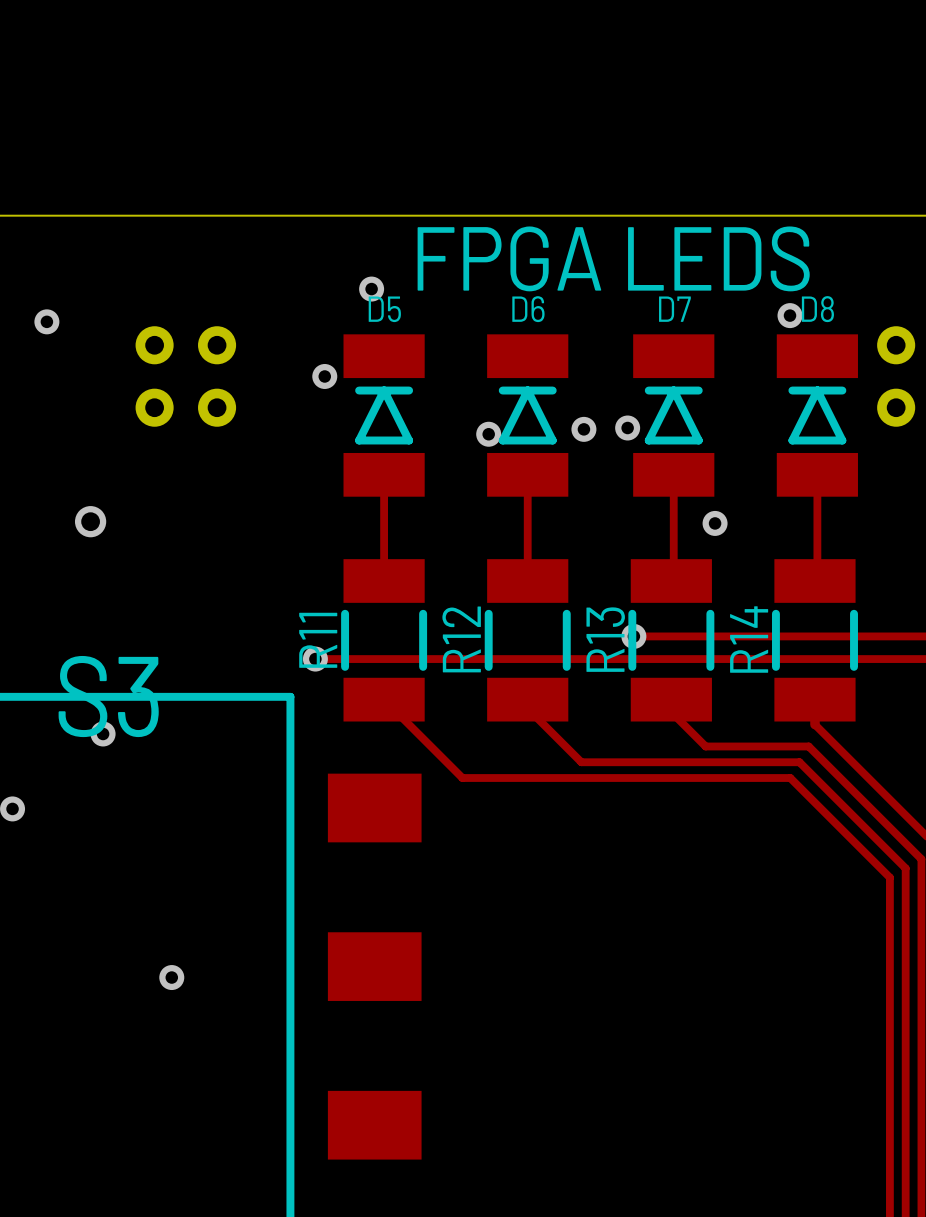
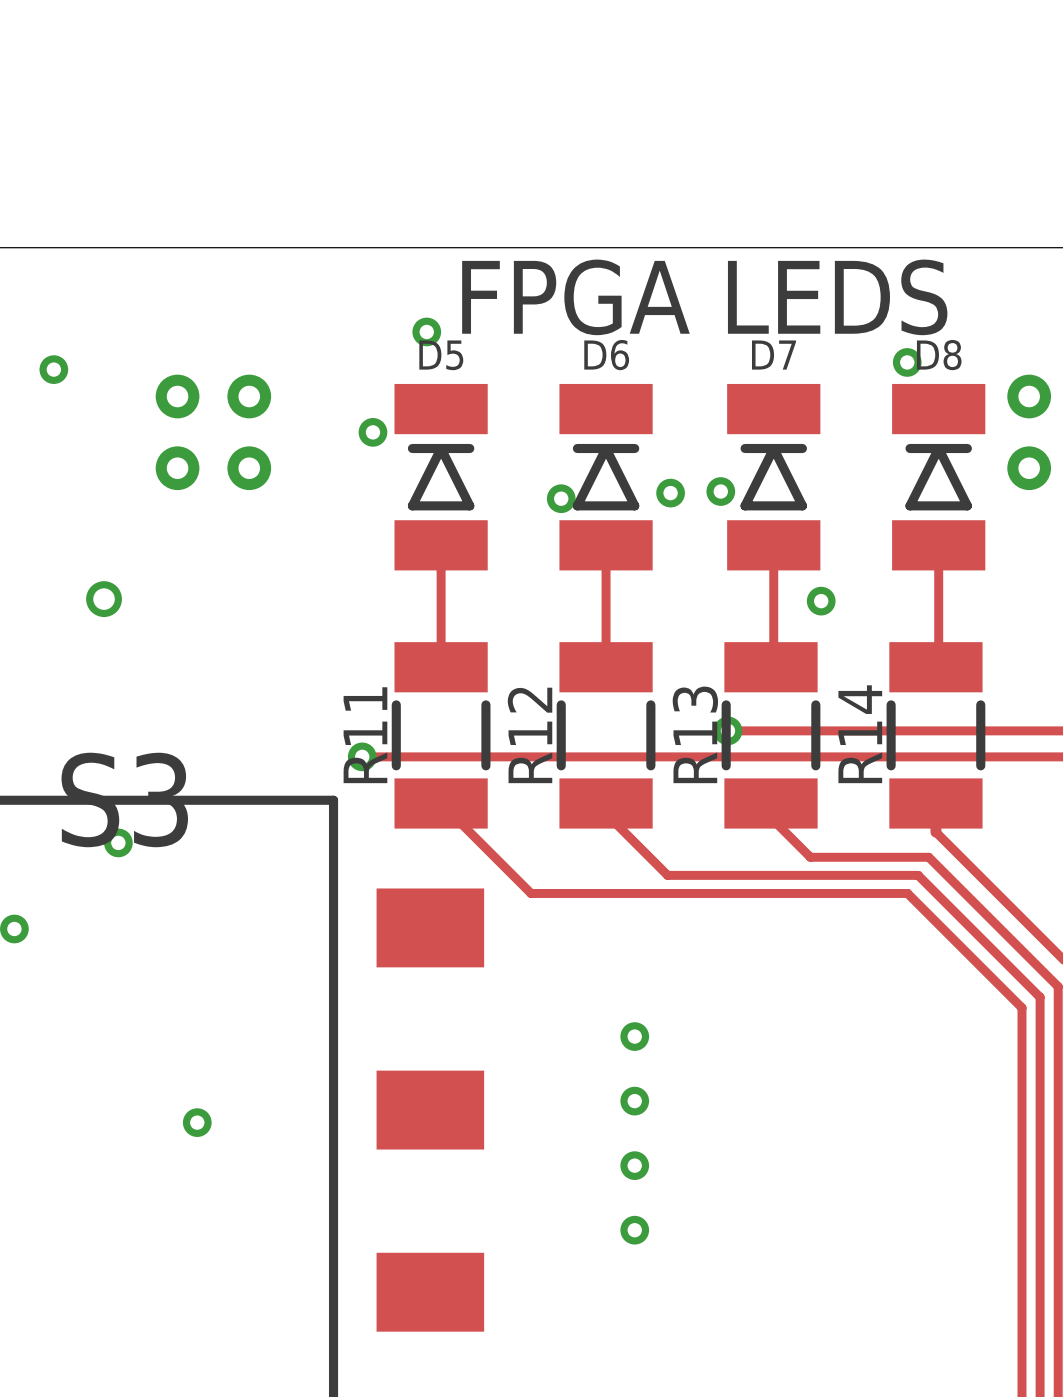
via: none -> (634, 1036)
via: none -> (634, 1101)
via: none -> (634, 1165)
via: none -> (634, 1230)

